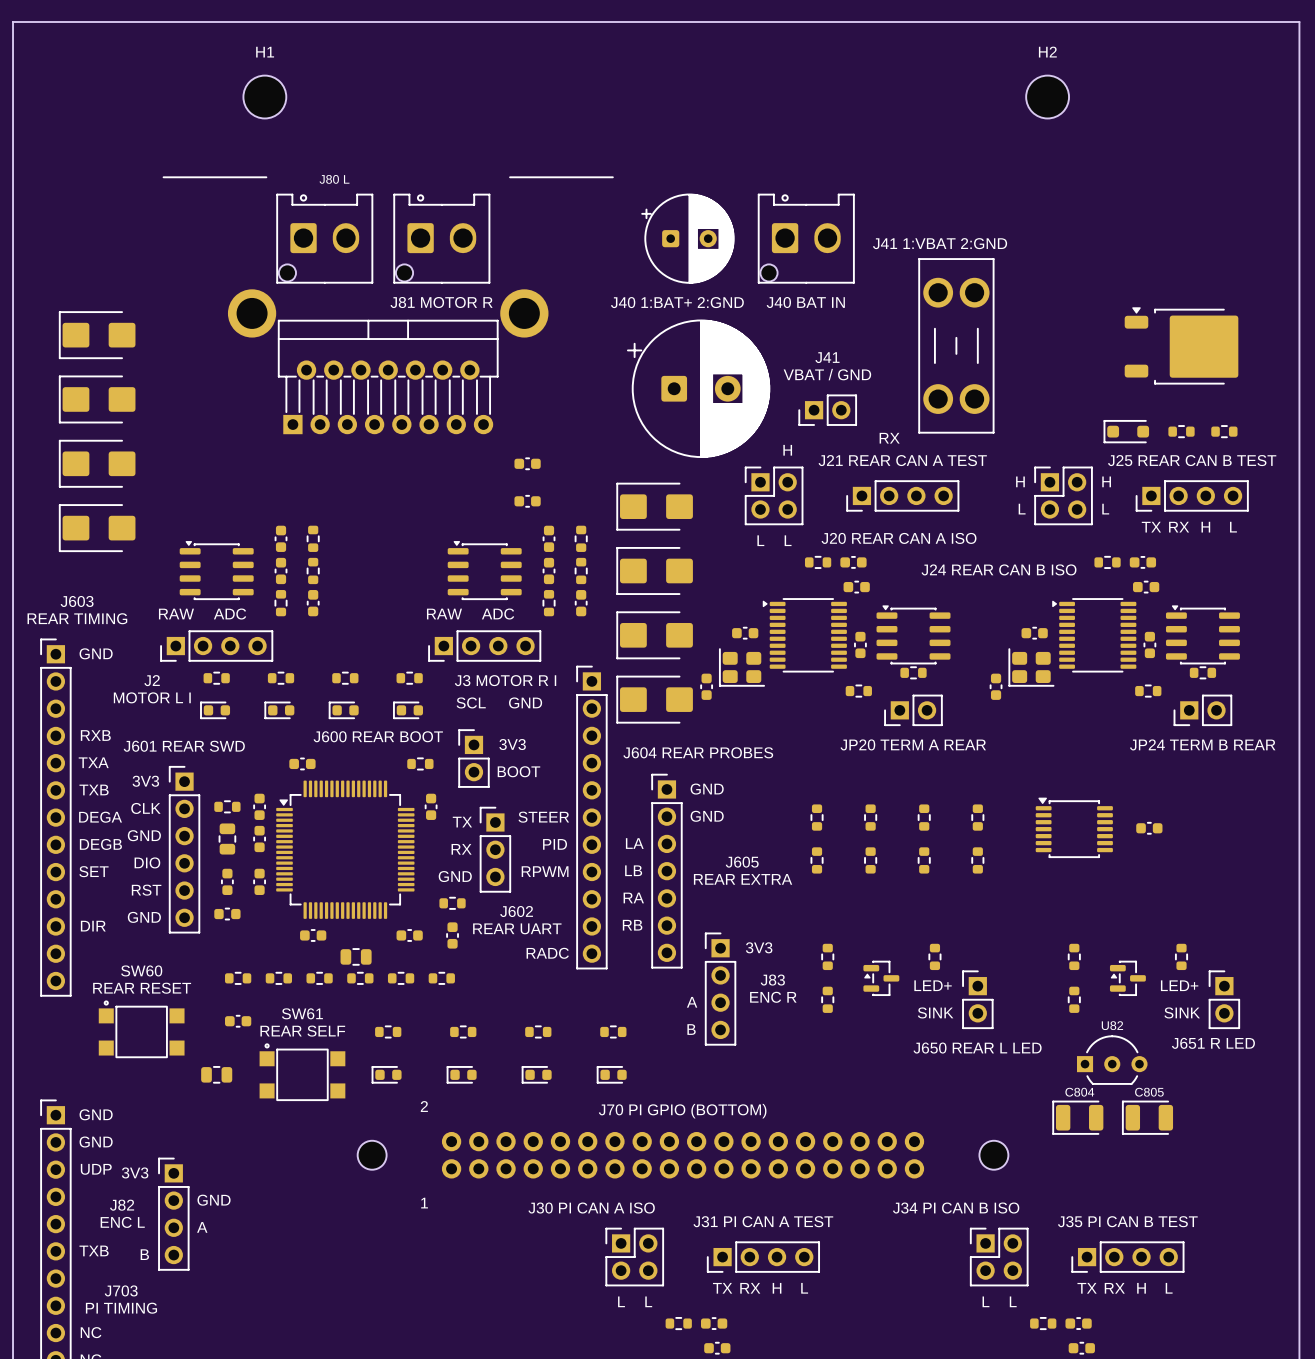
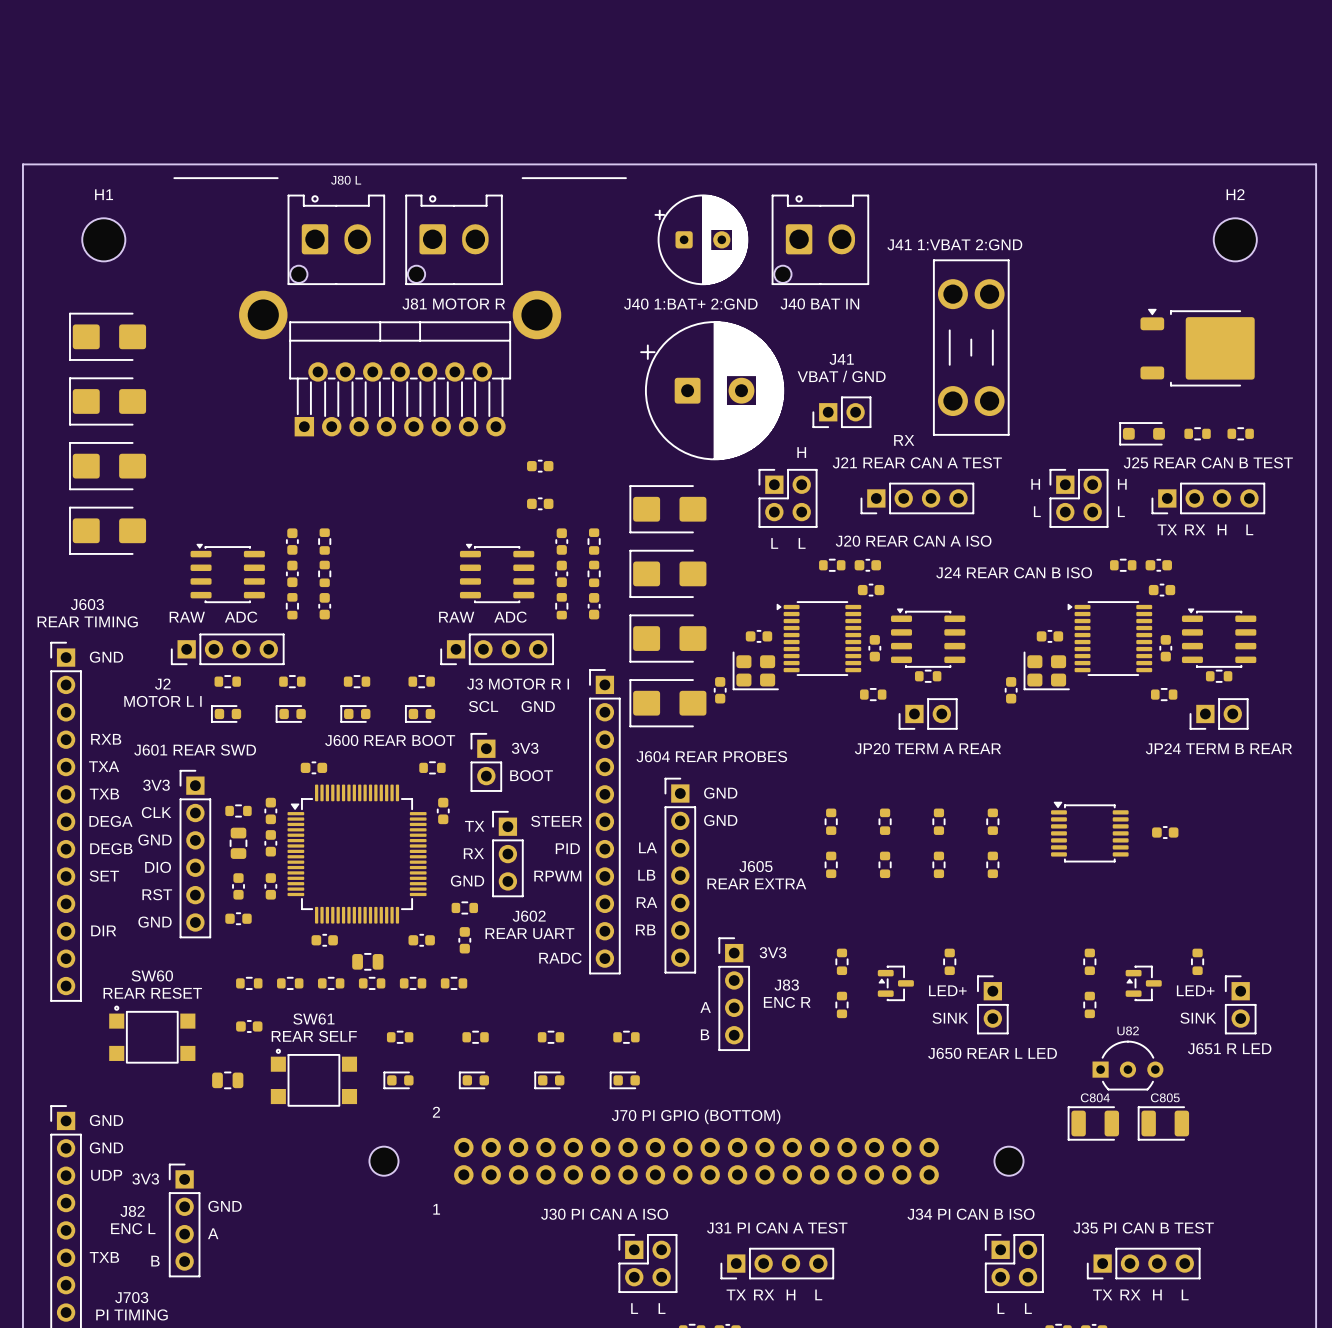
H1 position: (264, 97) -> (103, 239)
H2 position: (1047, 97) -> (1235, 239)
board edge: (13, 163) (13, 21) (1299, 21) (1299, 163) -> (22, 164) (1316, 164)

